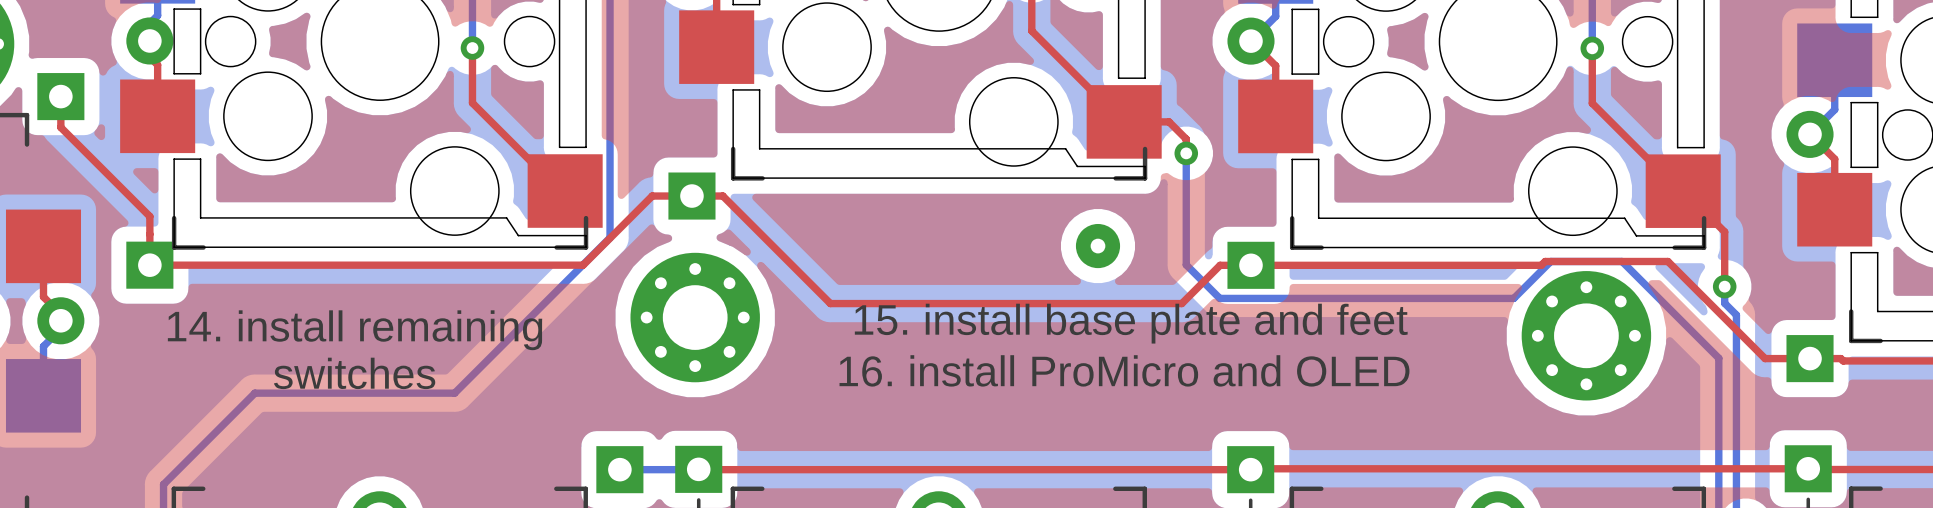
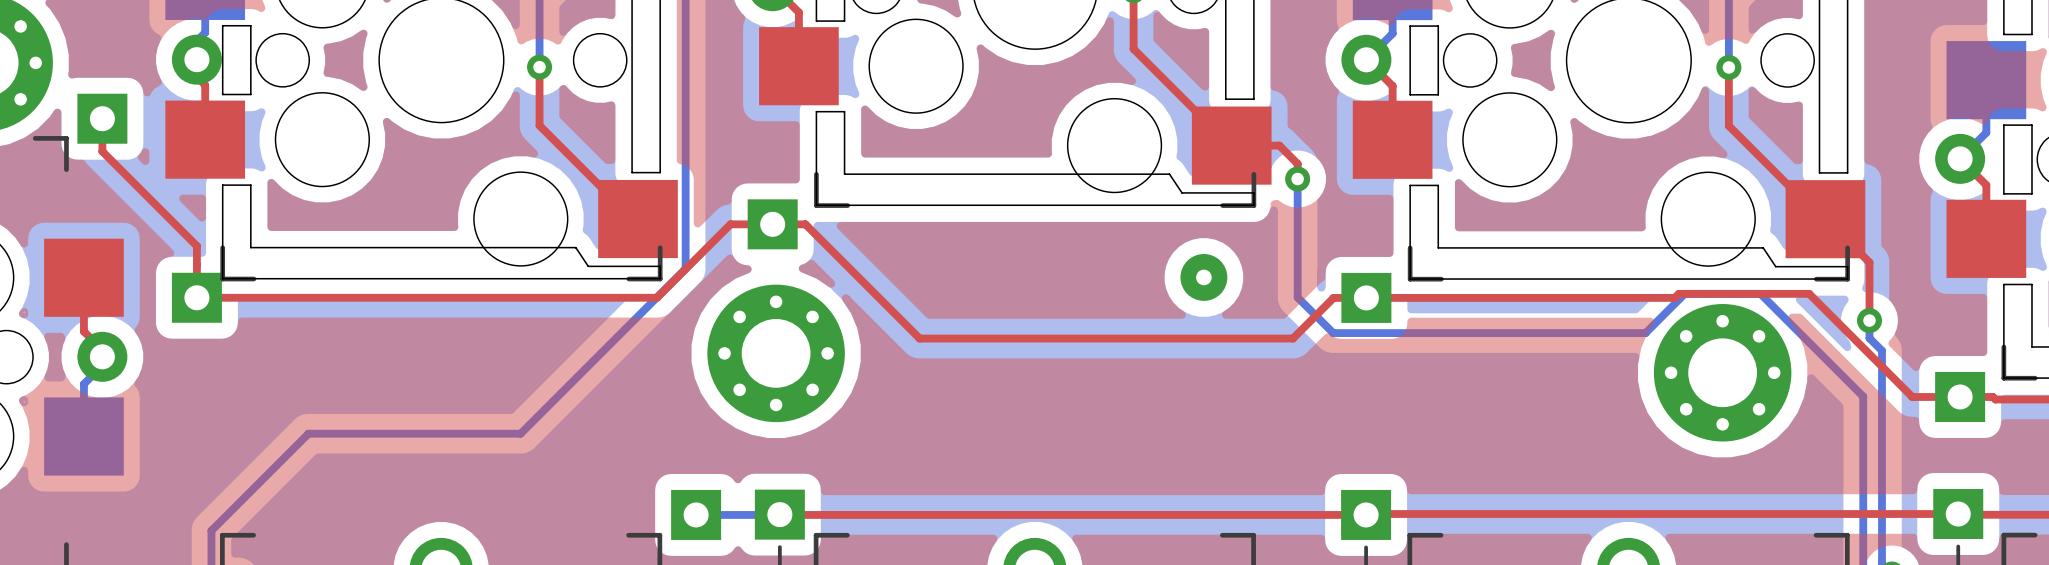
text: 15. install base plate and feet (1131, 323) -> none
text: 14. install remaining (355, 330) -> none
text: 16. install ProMicro and OLED (1124, 370) -> none
text: switches (354, 373) -> none

